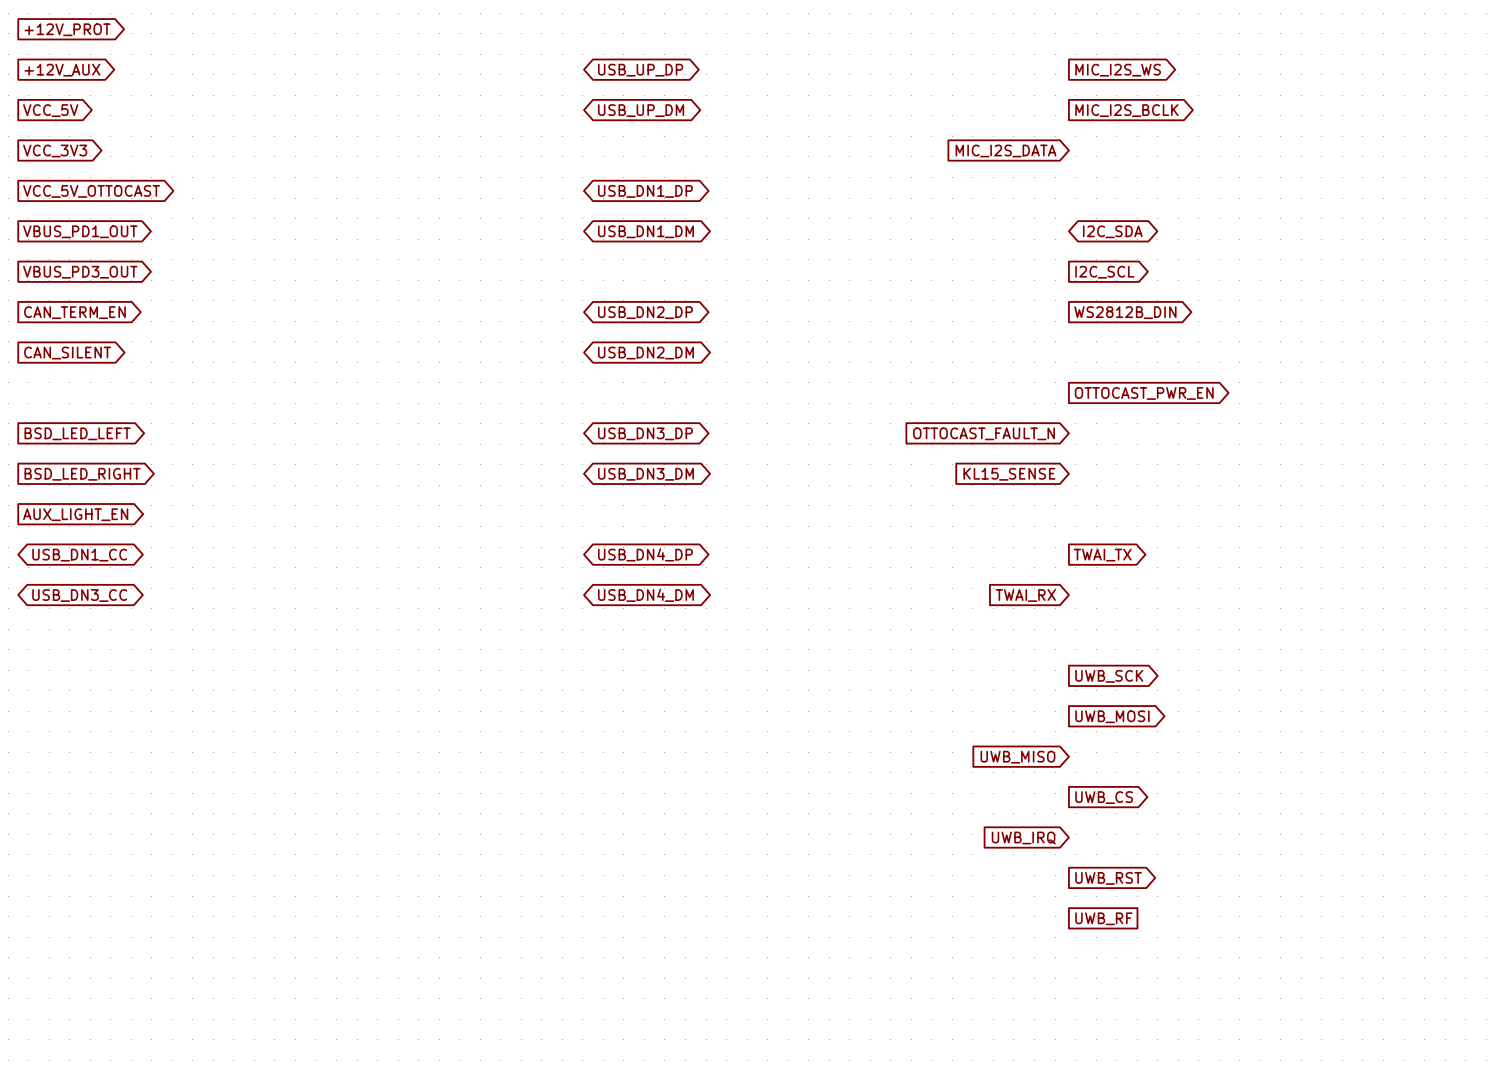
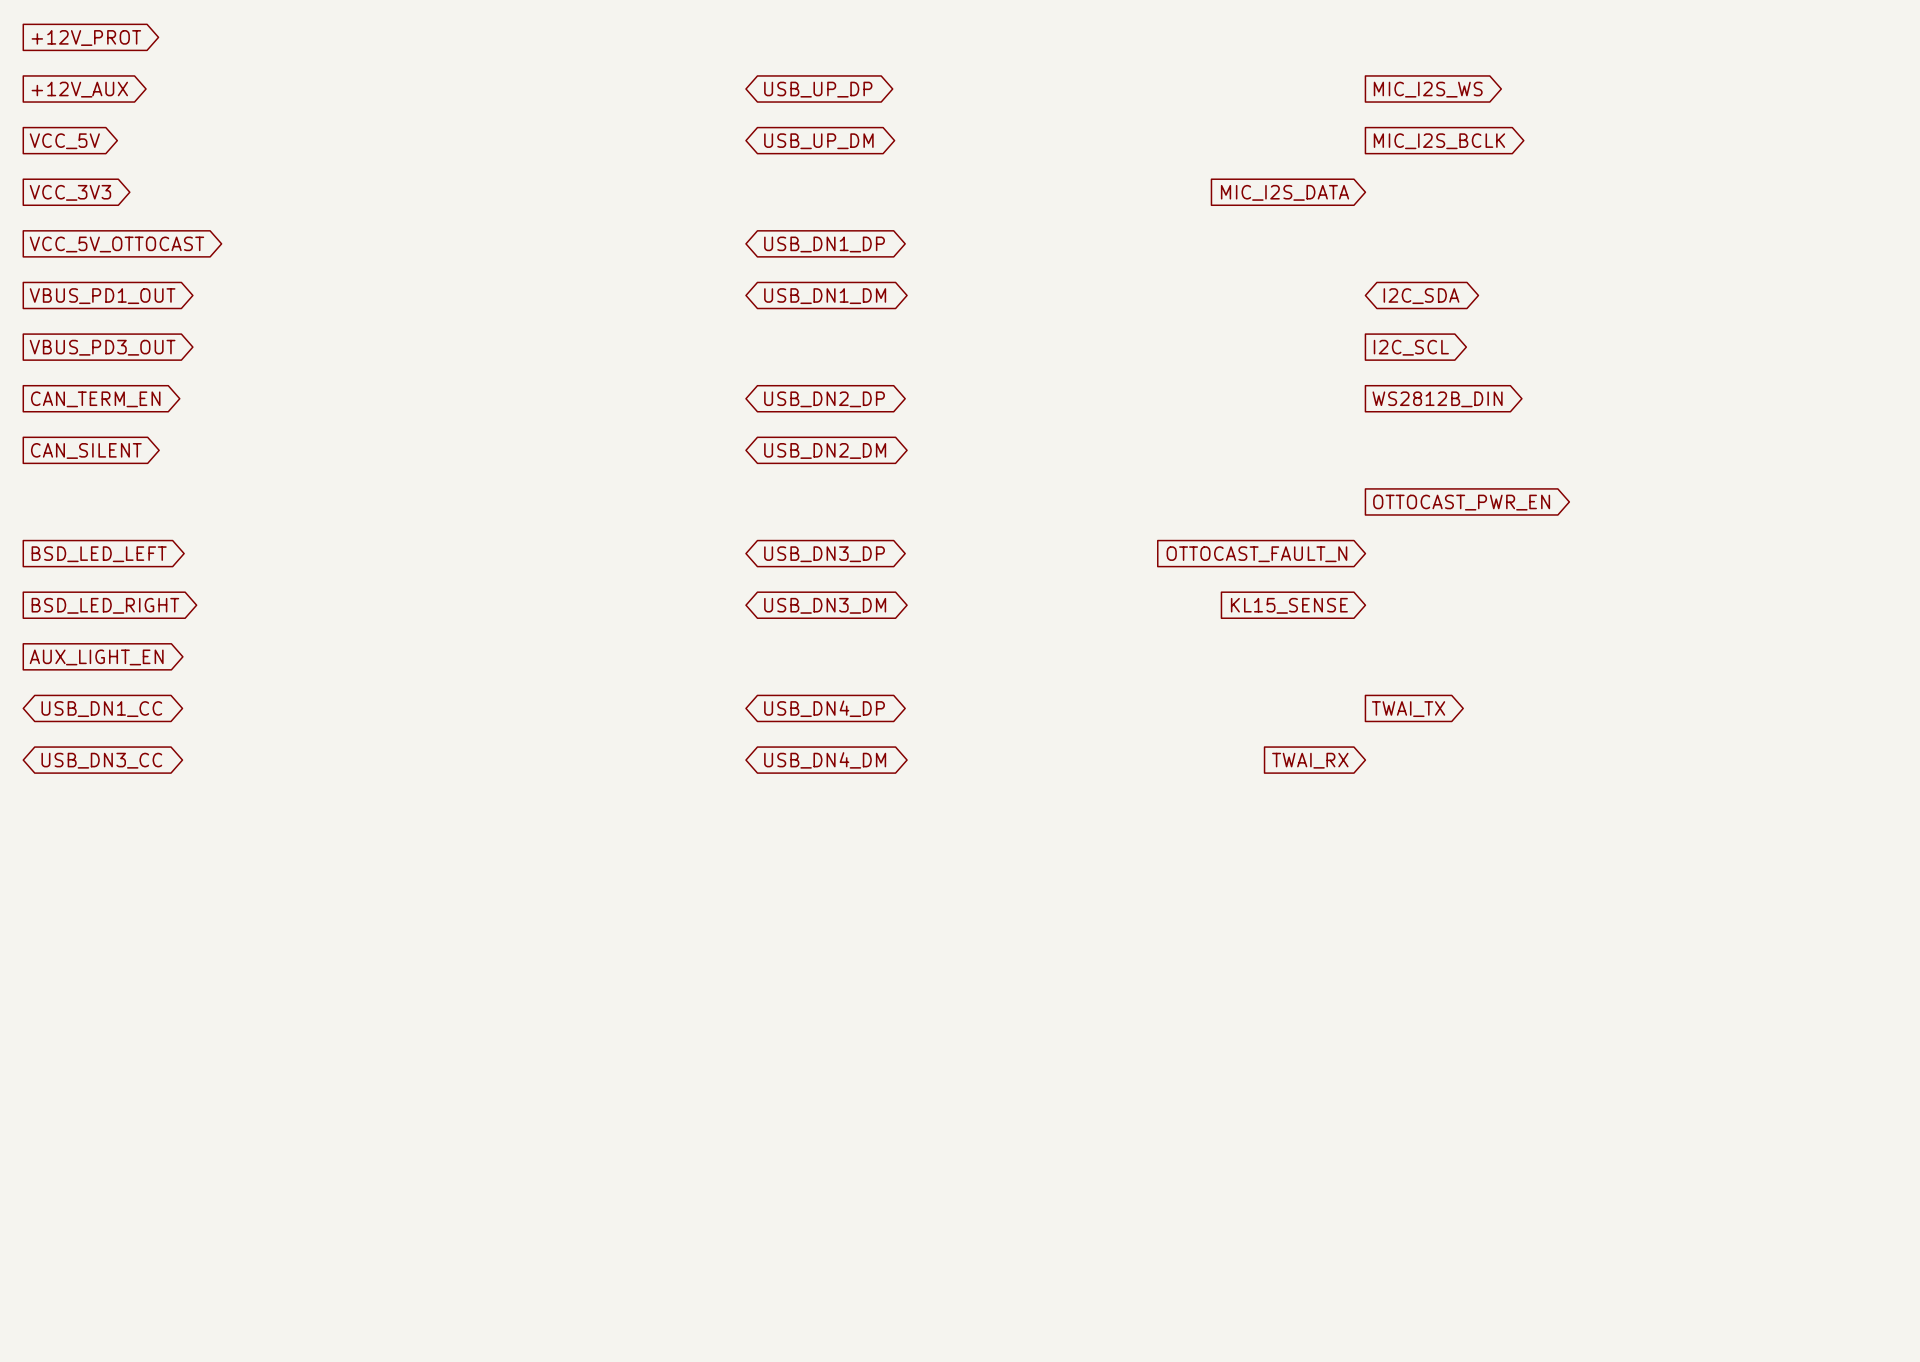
global label: UWB_SCK (1109, 676) -> none
global label: UWB_MOSI (1112, 716) -> none
global label: UWB_MISO (1017, 757) -> none
global label: UWB_CS (1104, 797) -> none
global label: UWB_IRQ (1023, 837) -> none
global label: UWB_RST (1108, 878) -> none
global label: UWB_RF (1103, 918) -> none

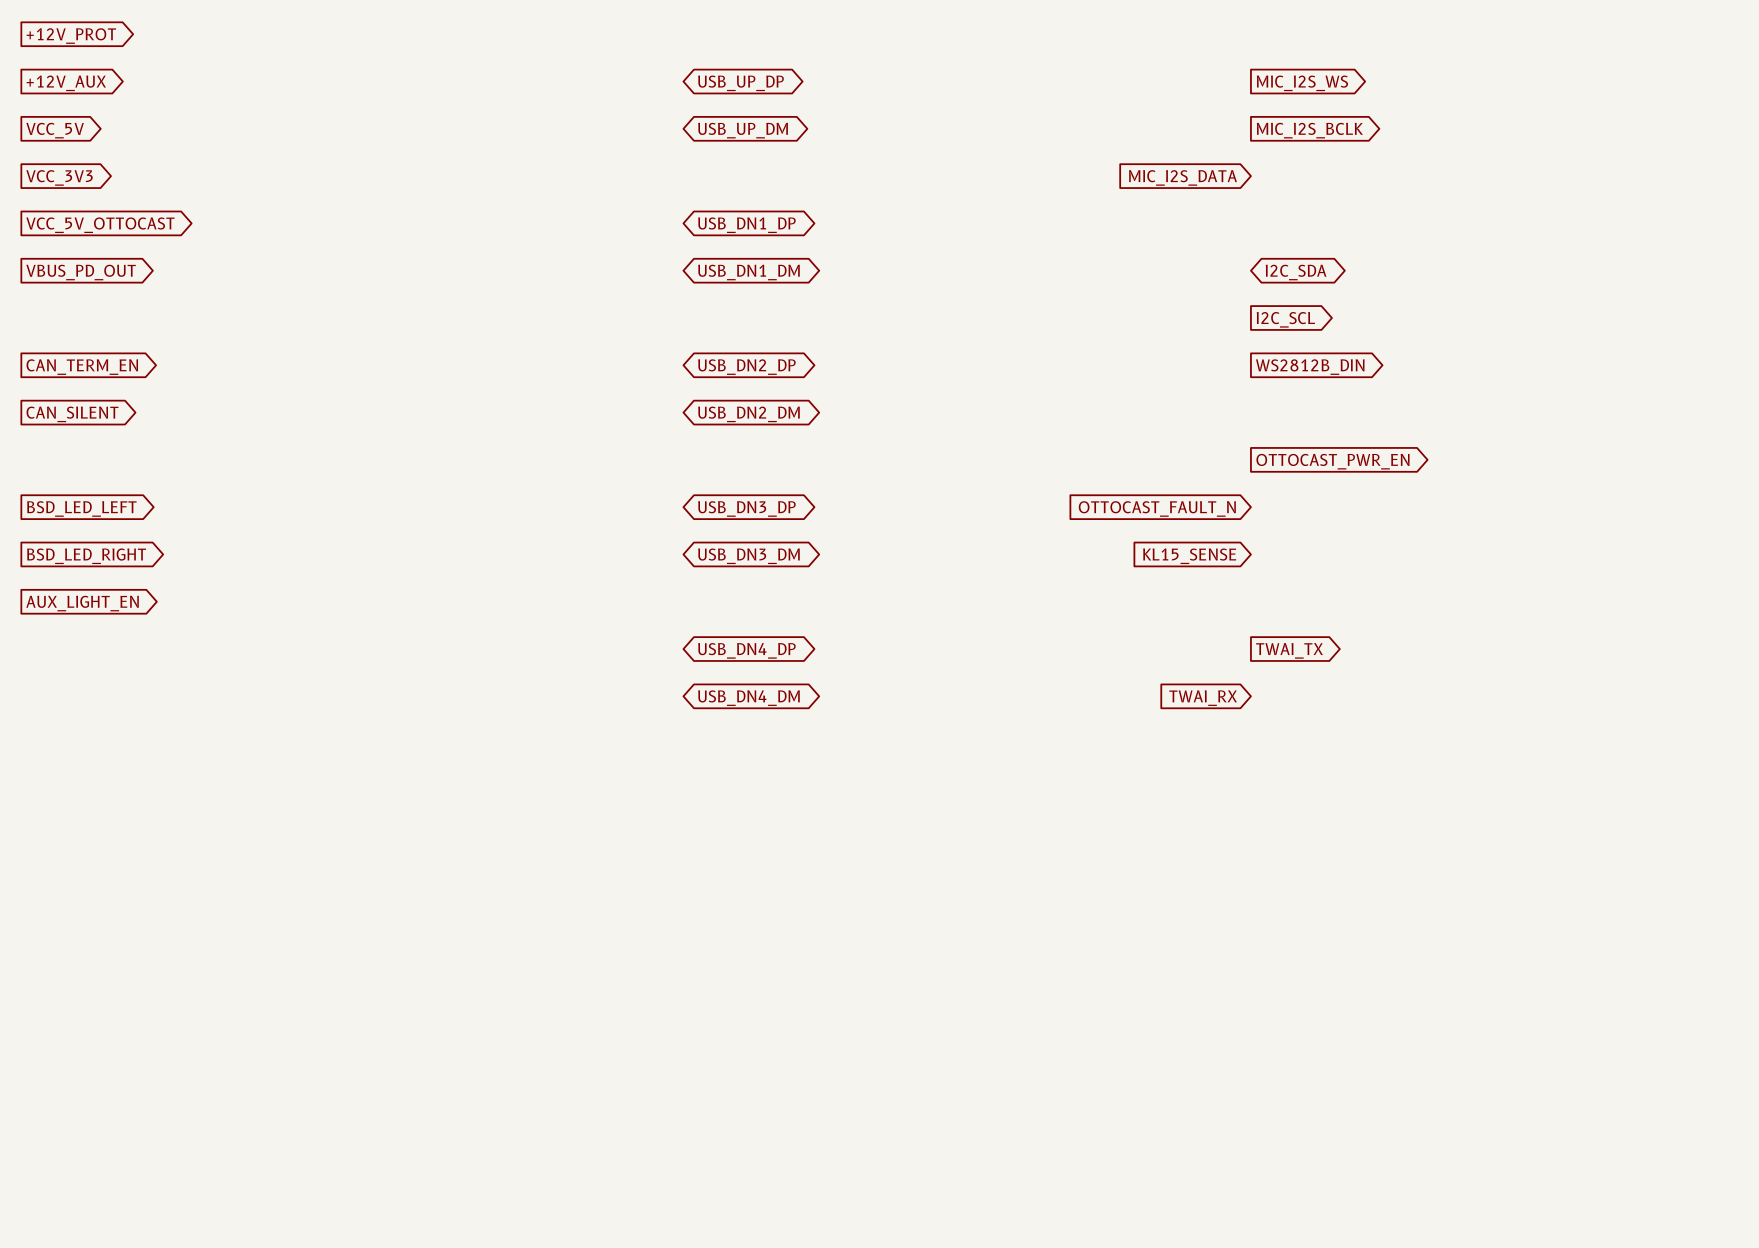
global label: VBUS_PD1_OUT (102, 296) -> VBUS_PD_OUT (81, 272)
global label: VBUS_PD3_OUT (102, 347) -> none
global label: USB_DN1_CC (101, 709) -> none
global label: USB_DN3_CC (101, 760) -> none

